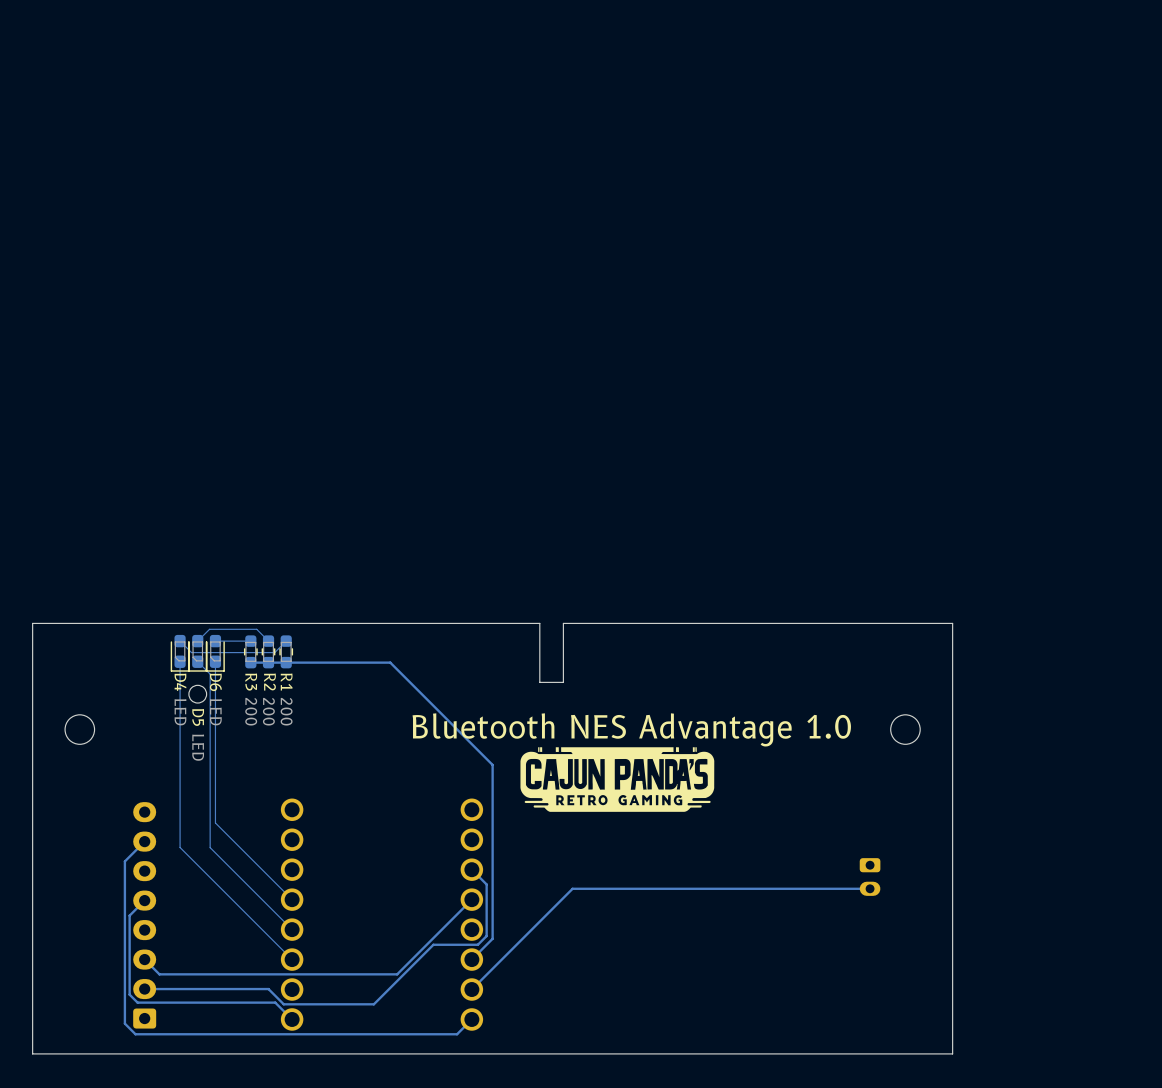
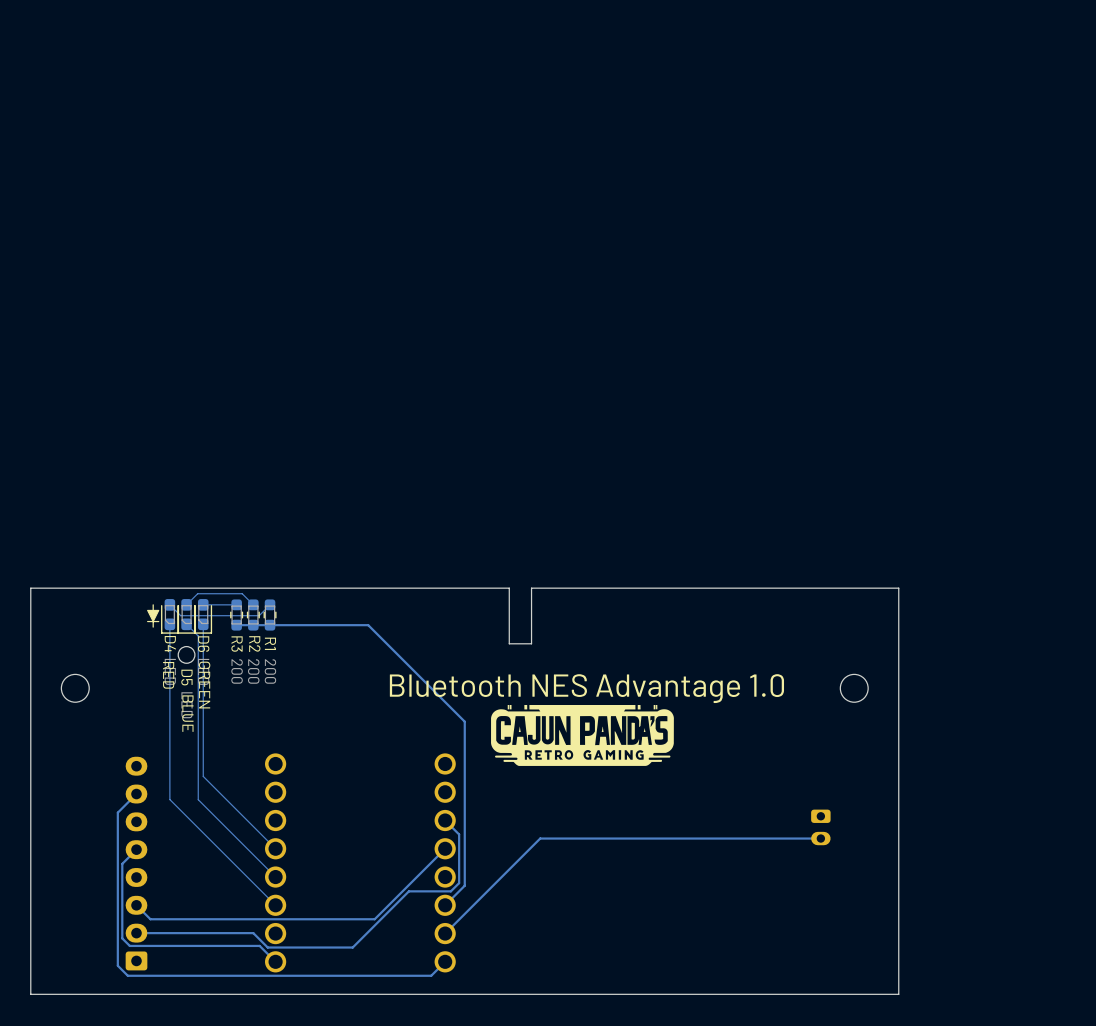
line: none -> (153, 604) (153, 610)
drawing: none -> [147, 609, 160, 623]
line: none -> (153, 621) (153, 627)
line: none -> (158, 621) (147, 621)
text: none -> RED (168, 675)
text: none -> GREEN (204, 685)
text: none -> BLUE (187, 713)

